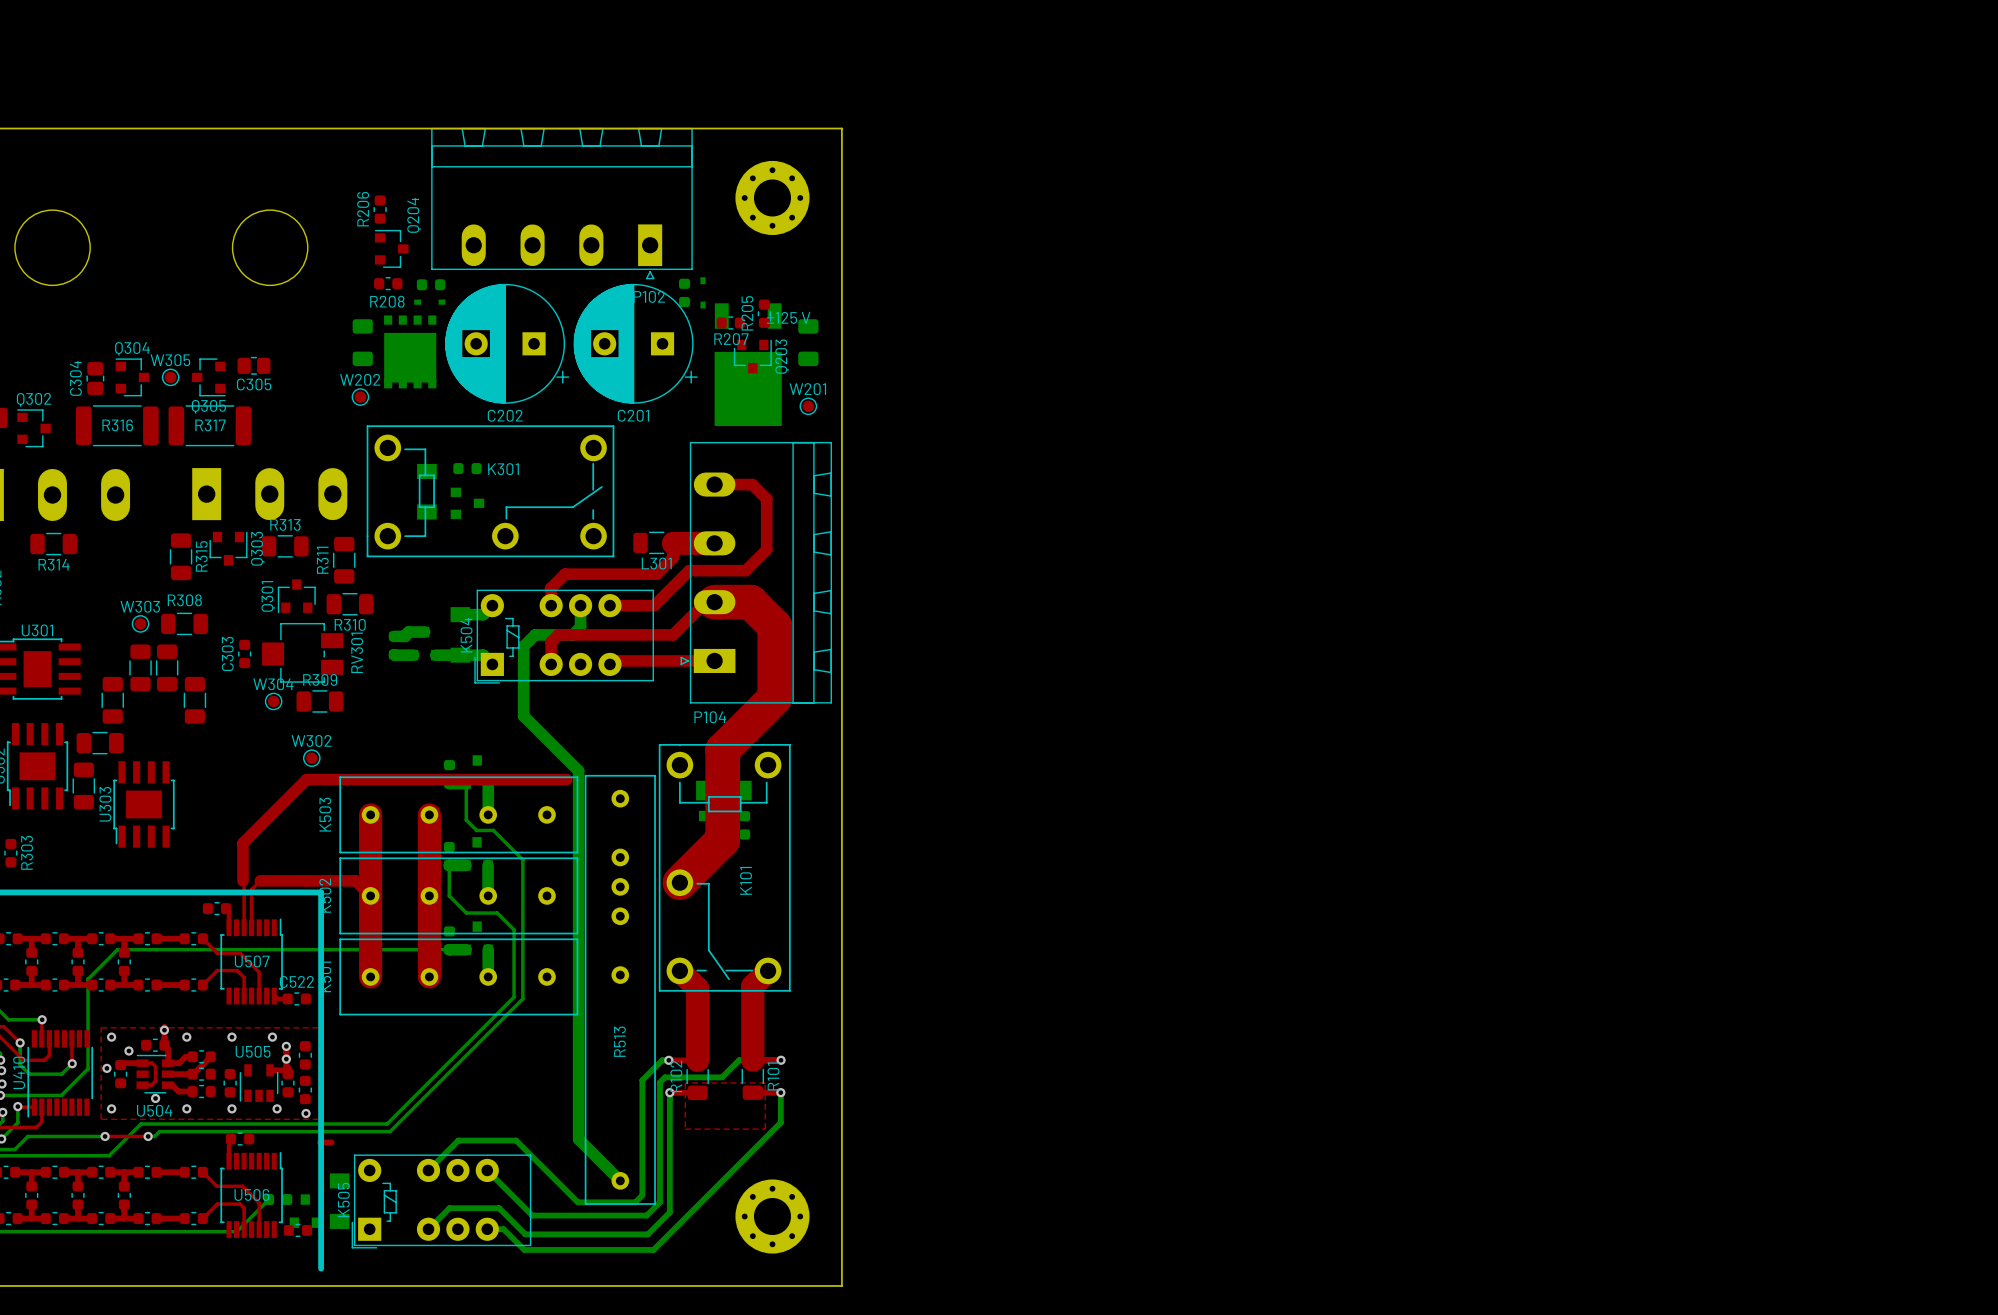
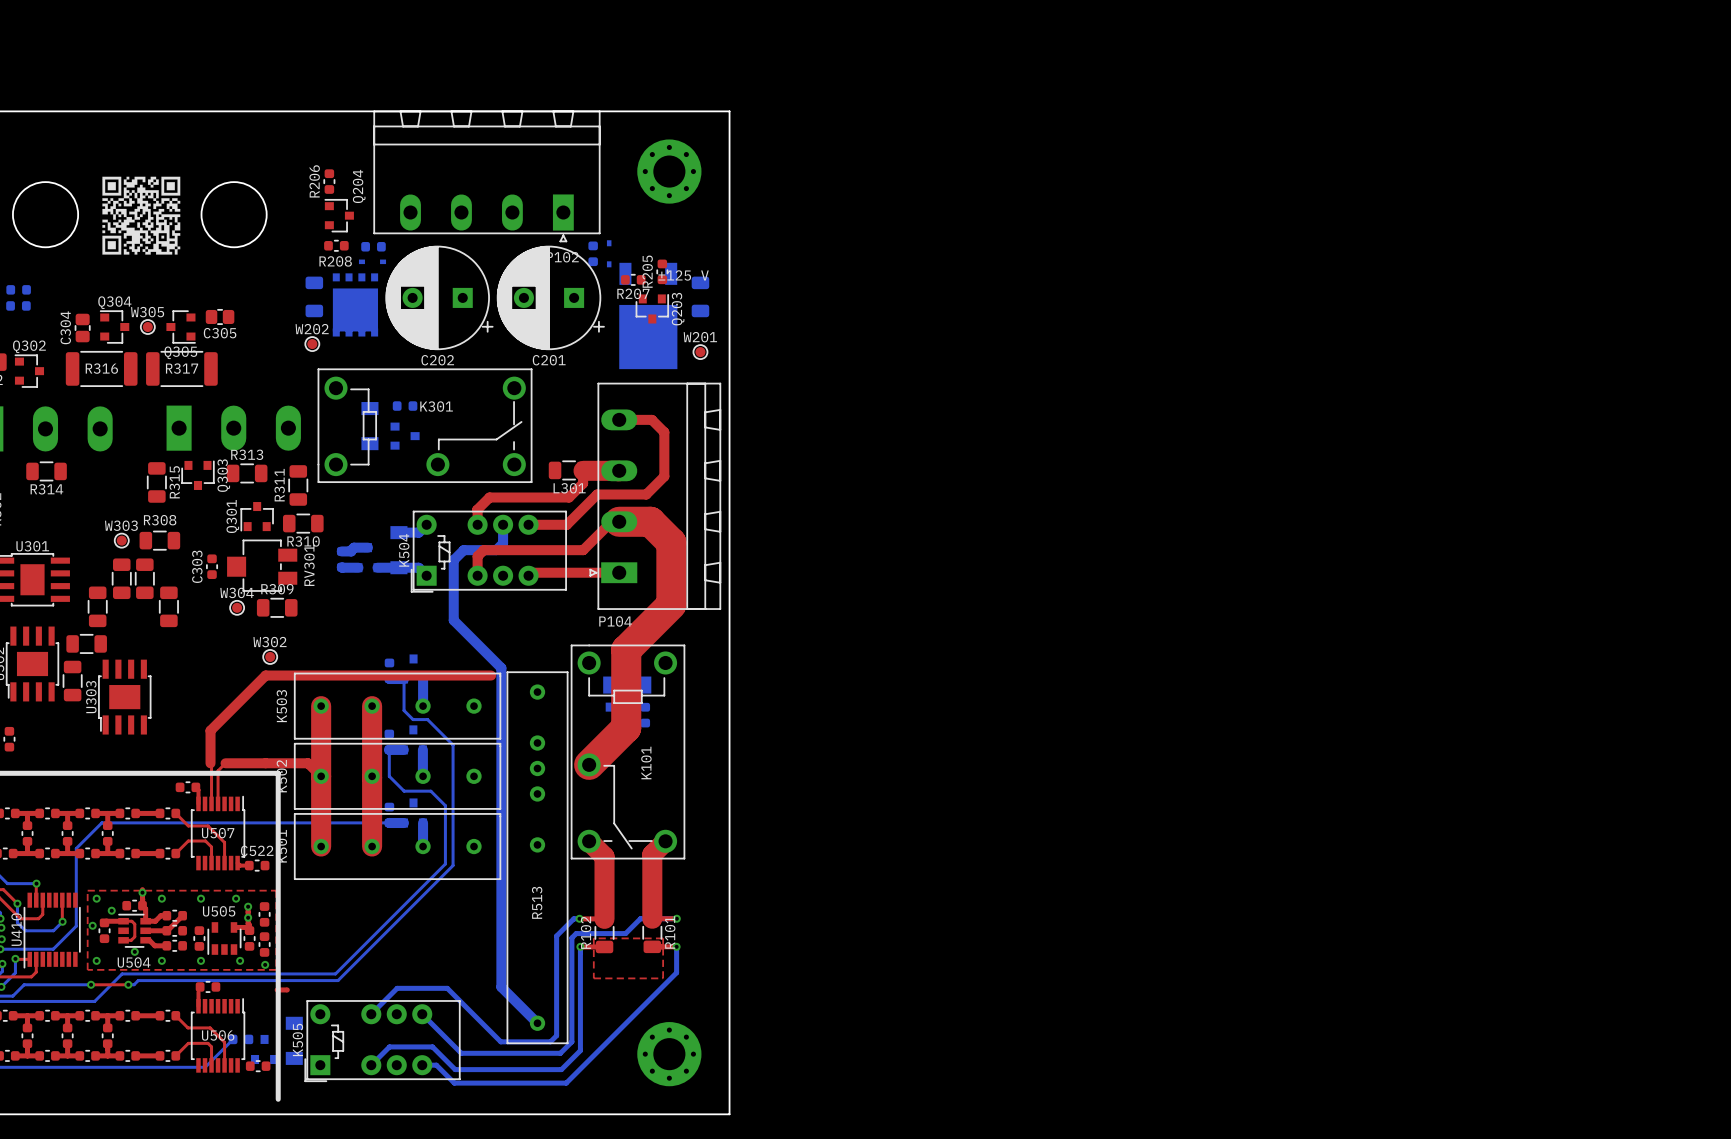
drawing: none -> [102, 176, 181, 255]
part: none -> (18, 289)
part: none -> (18, 305)
R303 name: R303 (27, 852) -> none

